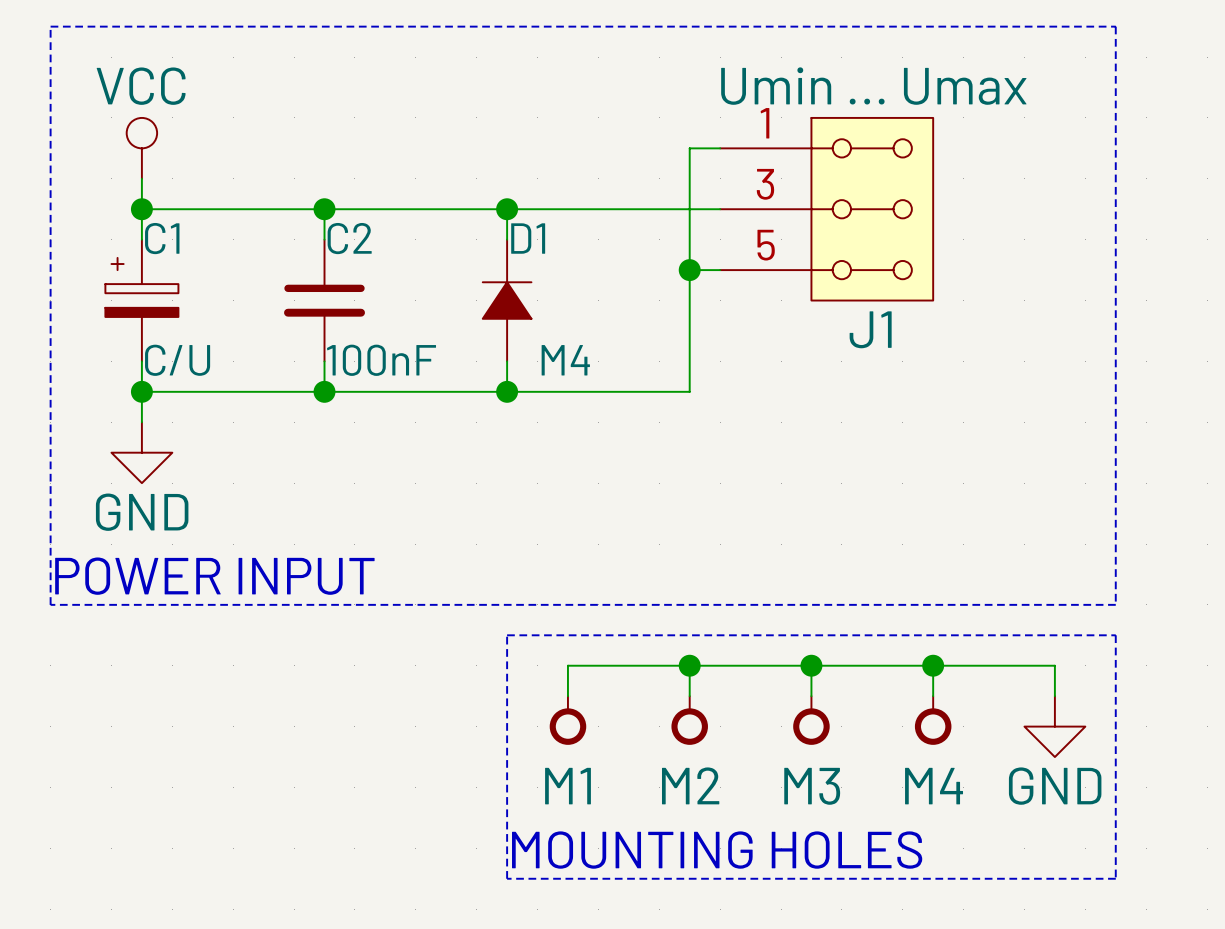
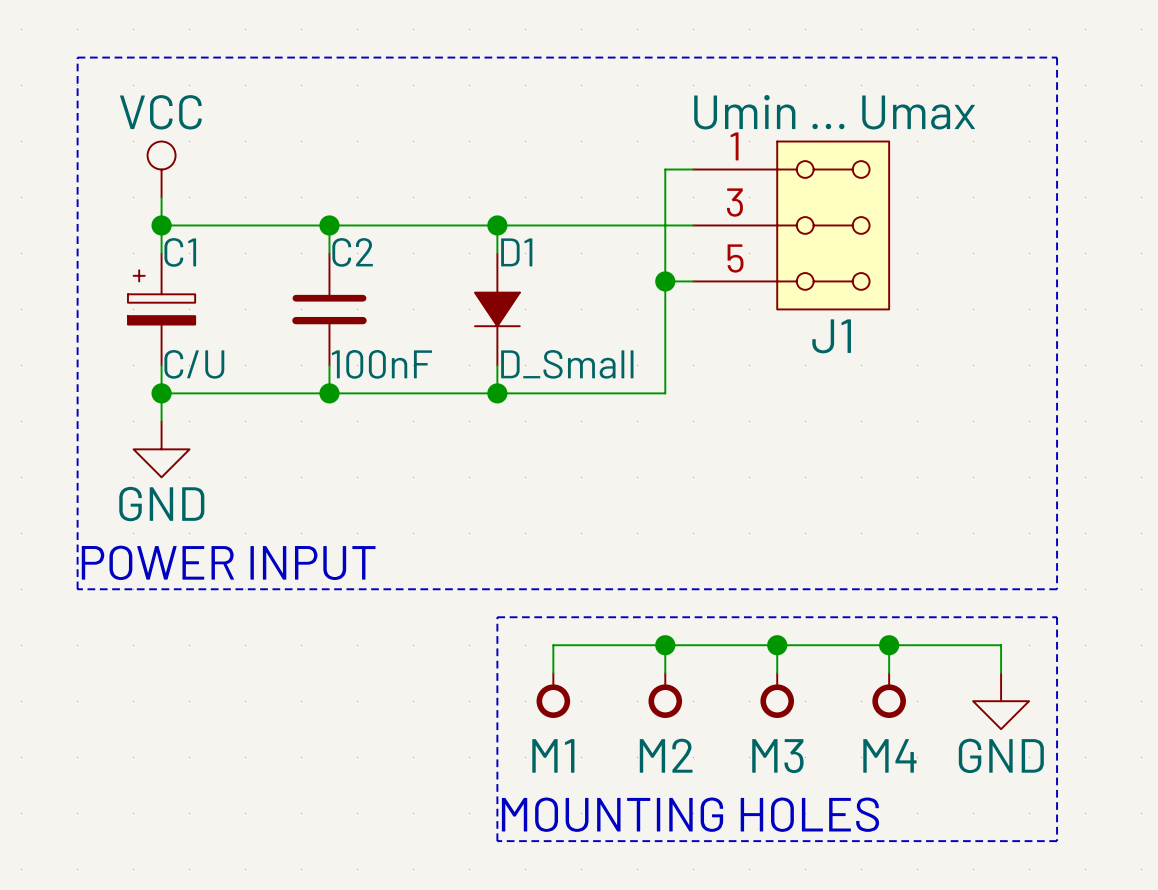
D1 rotation: 0° (507, 300) -> 180° (497, 309)
D1 value: M4 (565, 360) -> D_Small (567, 364)

